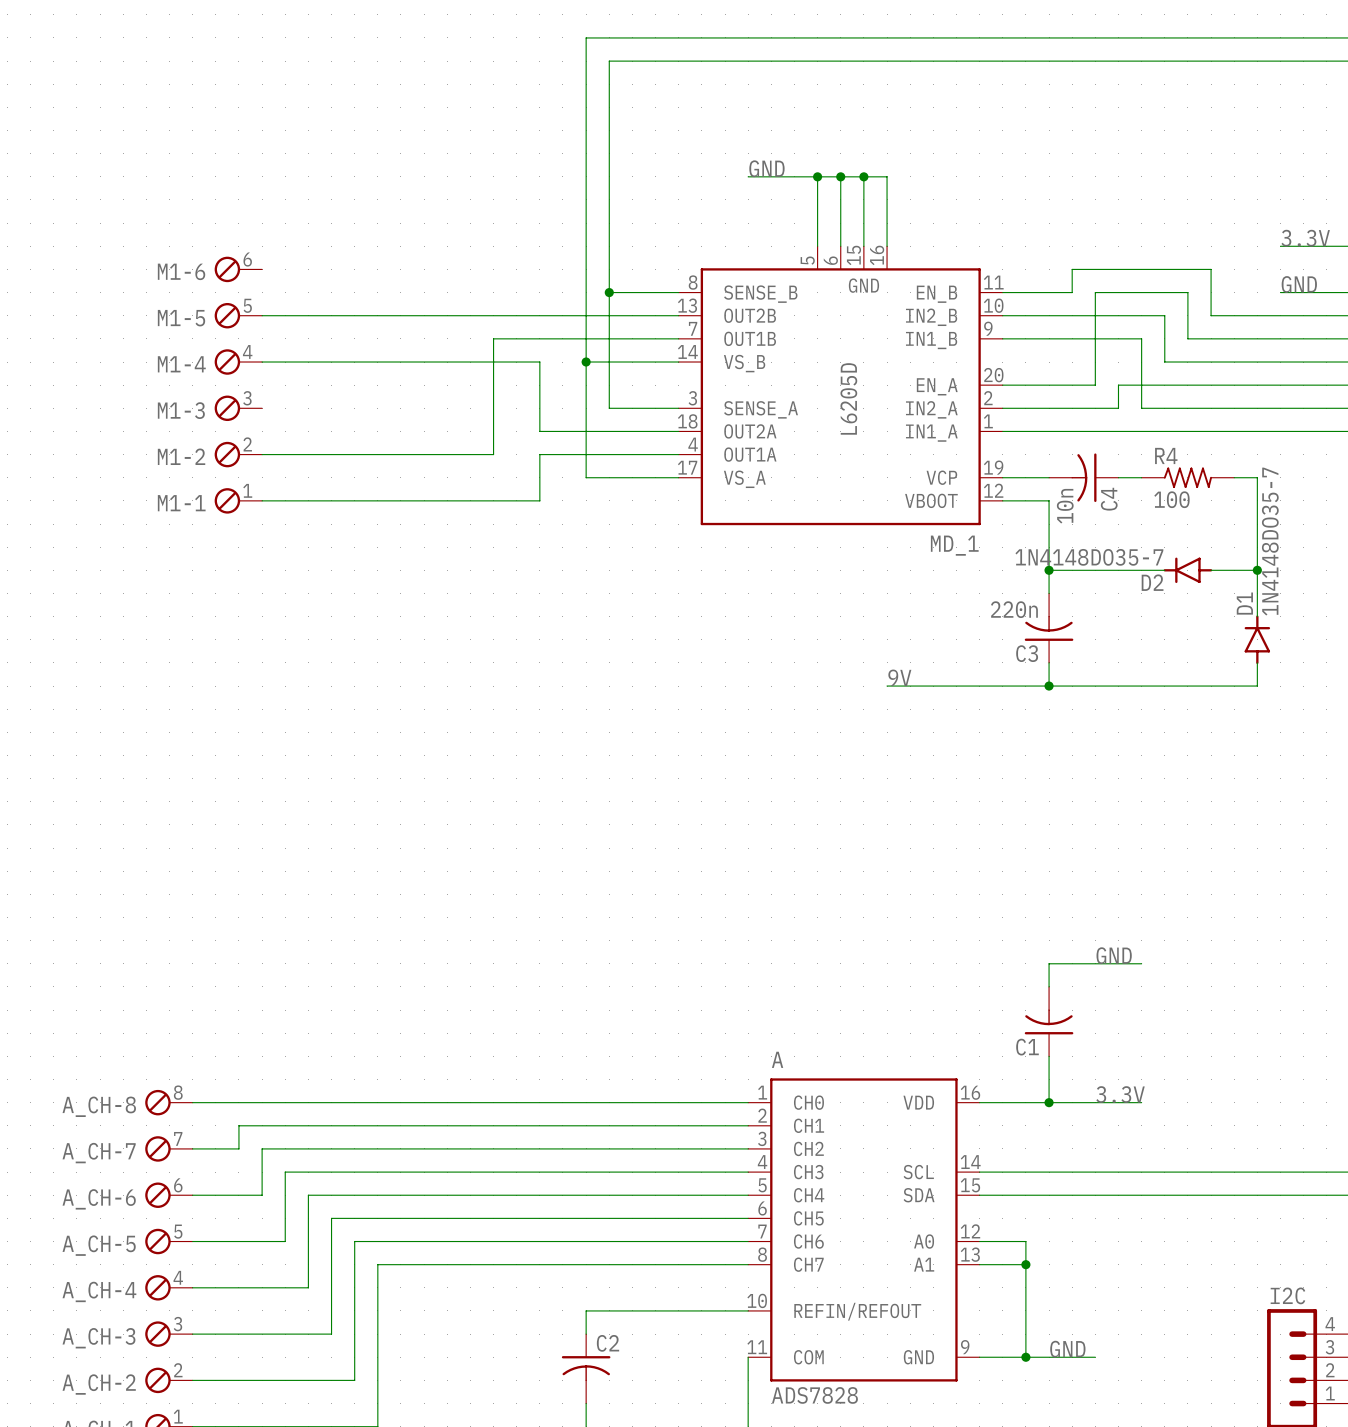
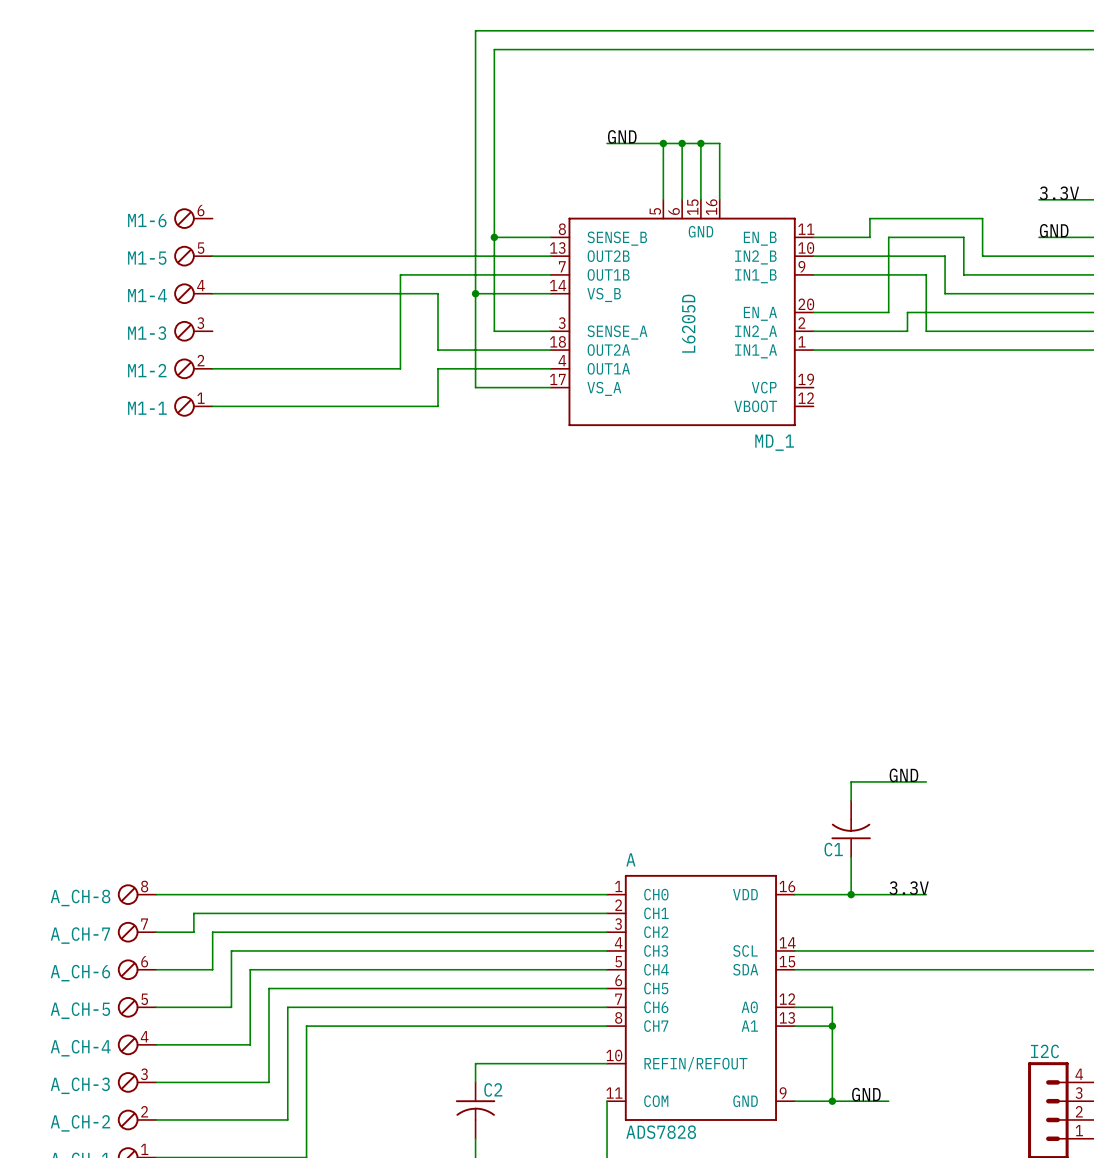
wire: (1002, 477) (1049, 477) -> none
C4: 10n (1083, 477) -> none
wire: (1118, 477) (1141, 477) -> none
R4: 100 (1187, 477) -> none
wire: (1234, 477) (1257, 477) (1257, 616) -> none
wire: (1002, 500) (1049, 500) (1049, 593) -> none
wire: (1049, 570) (1164, 570) -> none
junction: (1049, 570) -> none
D2: 1N4148DO35-7 (1187, 570) -> none
wire: (1211, 570) (1257, 570) -> none
junction: (1257, 570) -> none
C3: 220n (1049, 628) -> none
D1: 1N4148DO35-7 (1257, 639) -> none
wire: (1049, 662) (1049, 686) -> none
wire: (1257, 662) (1257, 686) (887, 686) -> none
label: 9V (899, 677) -> none
junction: (1049, 686) -> none

